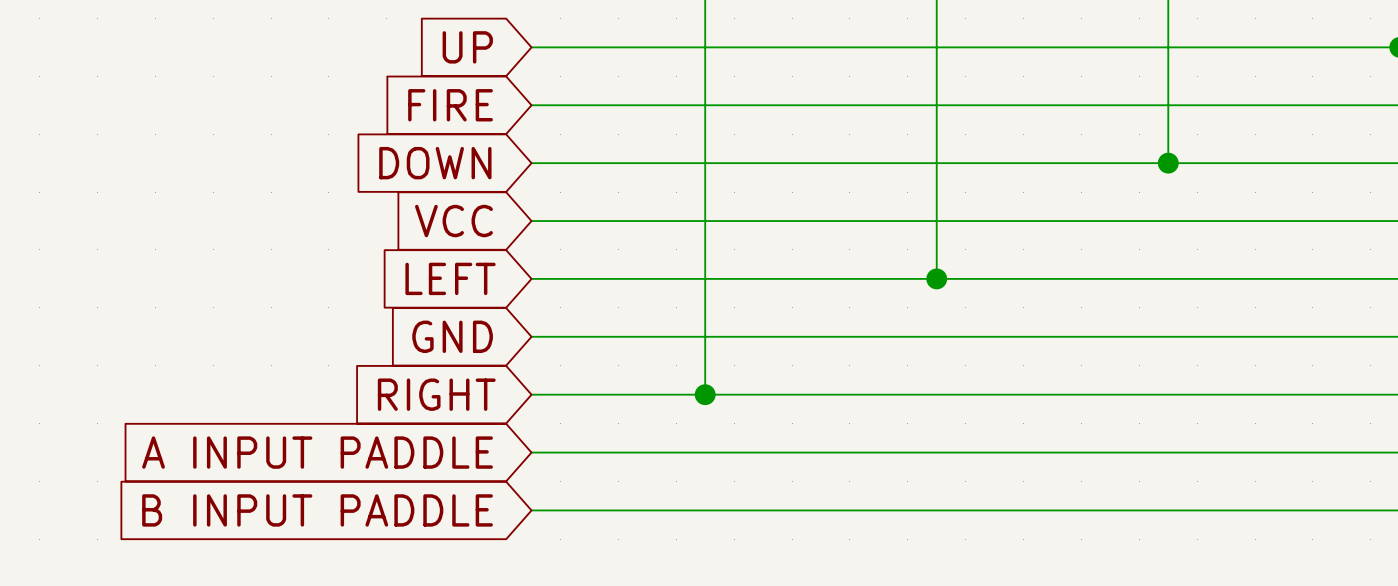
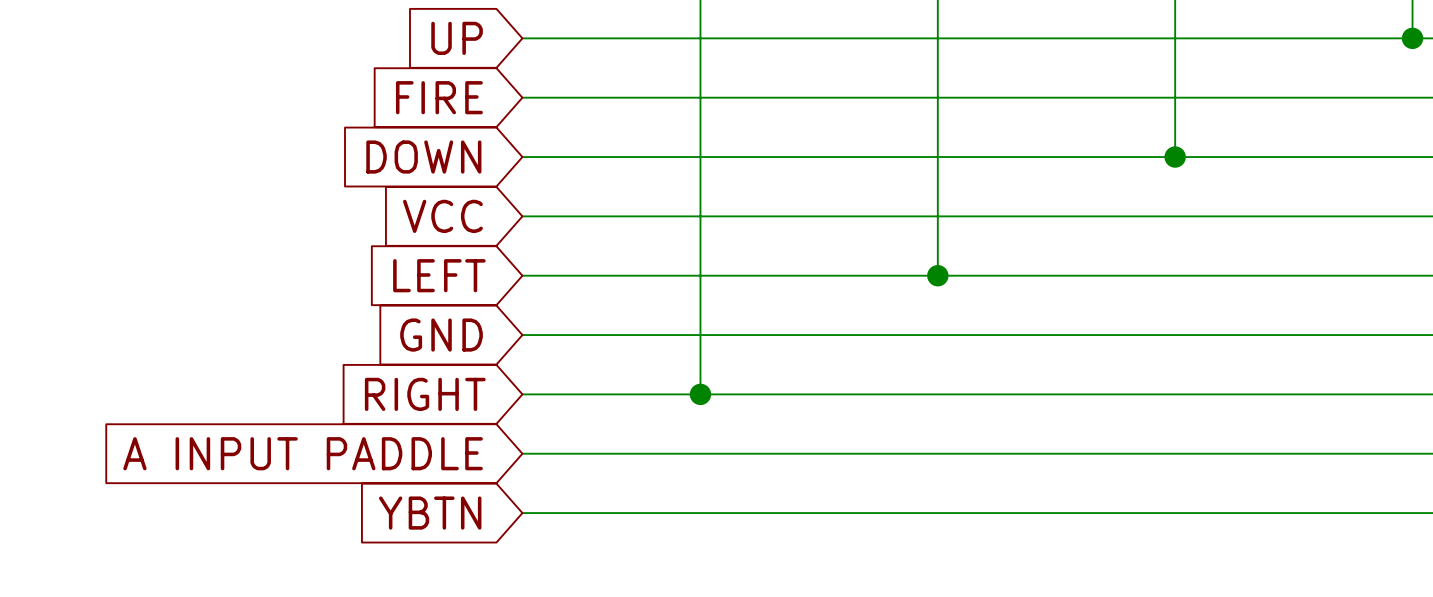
global label: B INPUT PADDLE (317, 510) -> YBTN (430, 513)

